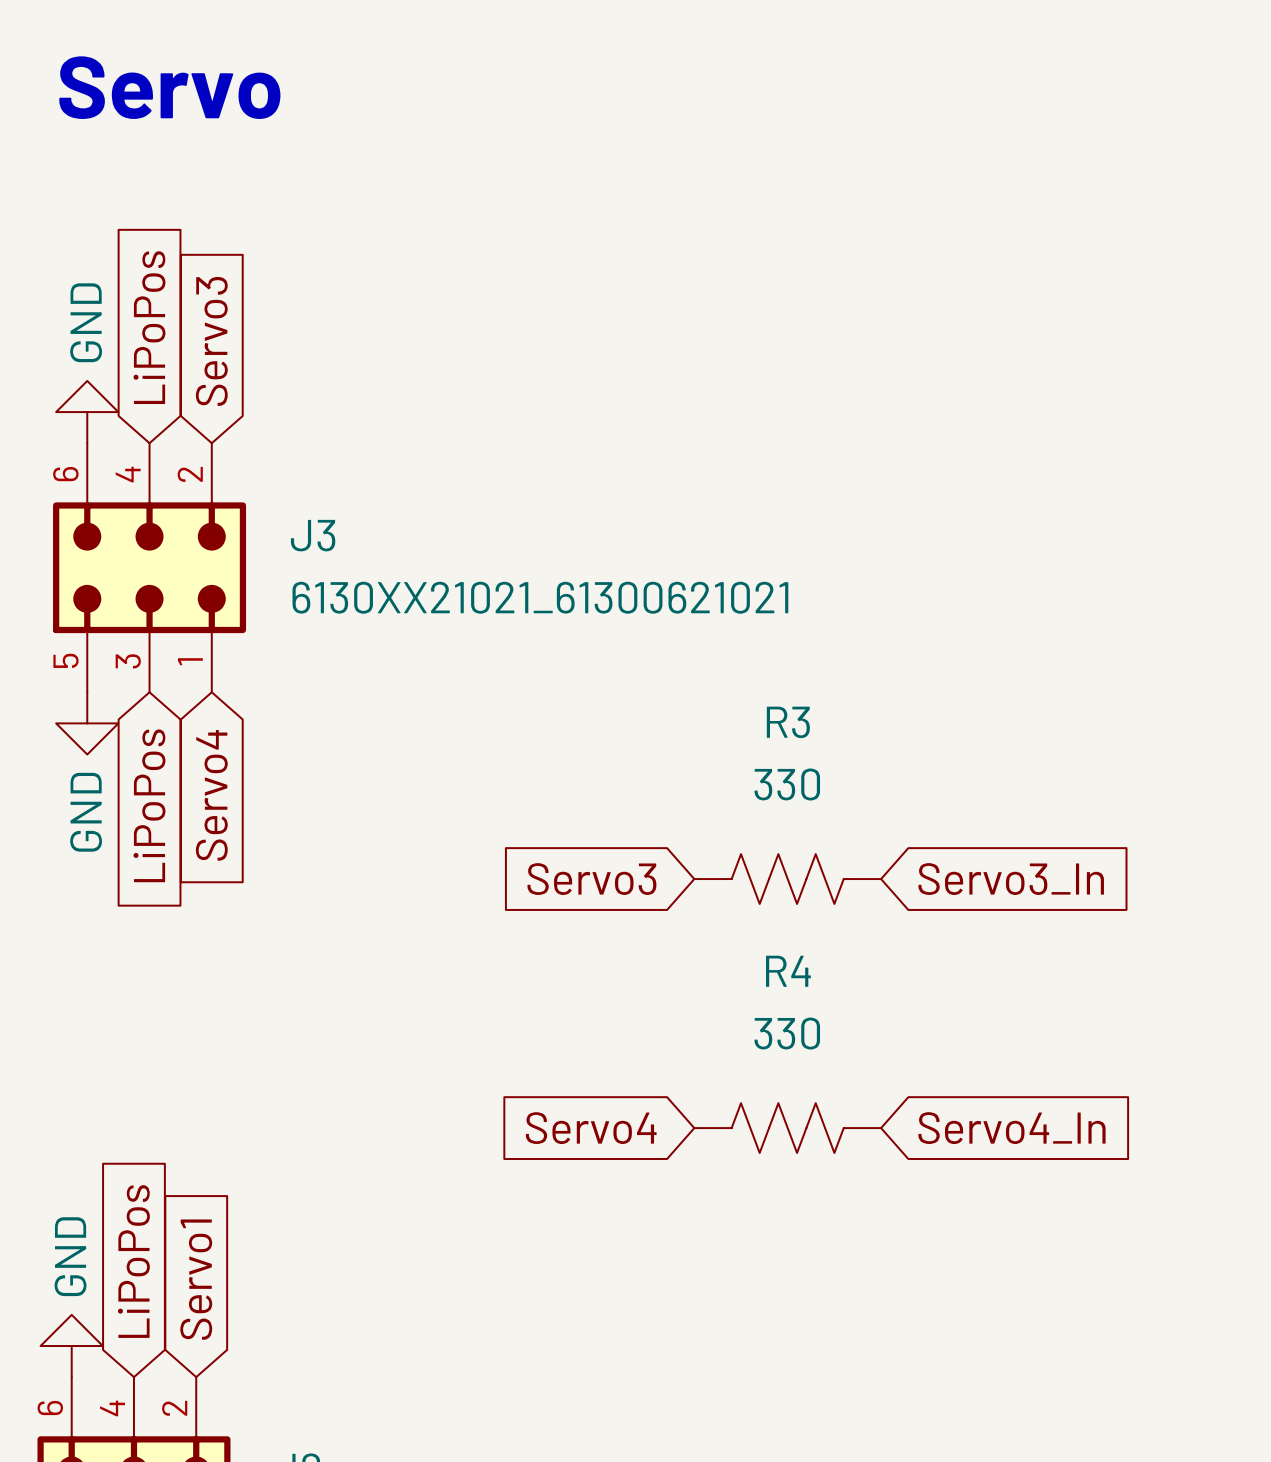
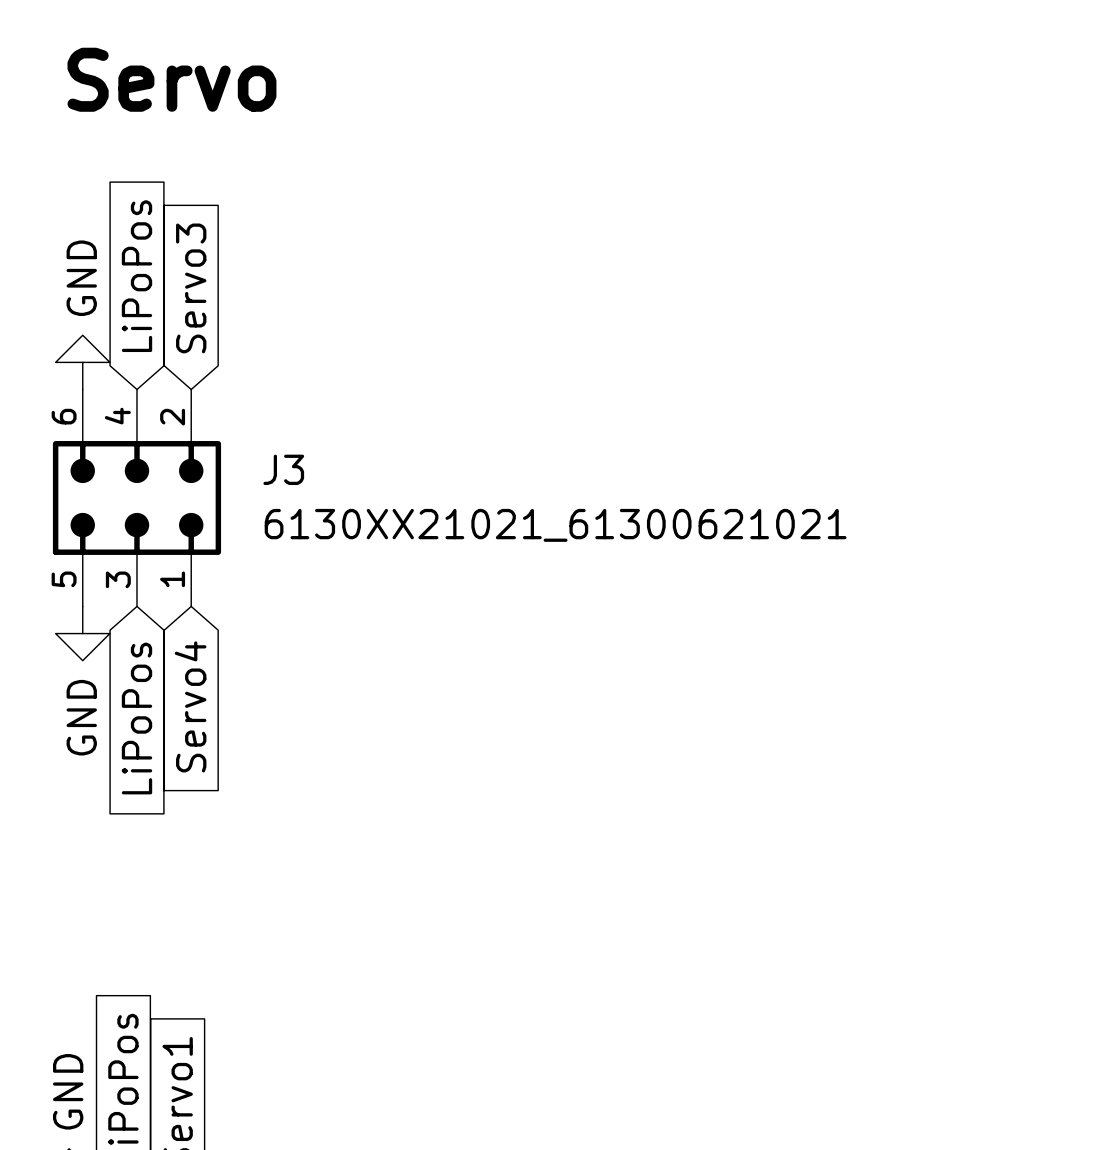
global label: Servo3 (591, 879) -> none
R3: 330 (787, 879) -> none
global label: Servo3_In (1011, 879) -> none
global label: Servo4 (591, 1128) -> none
R4: 330 (787, 1128) -> none
global label: Servo4_In (1012, 1128) -> none

